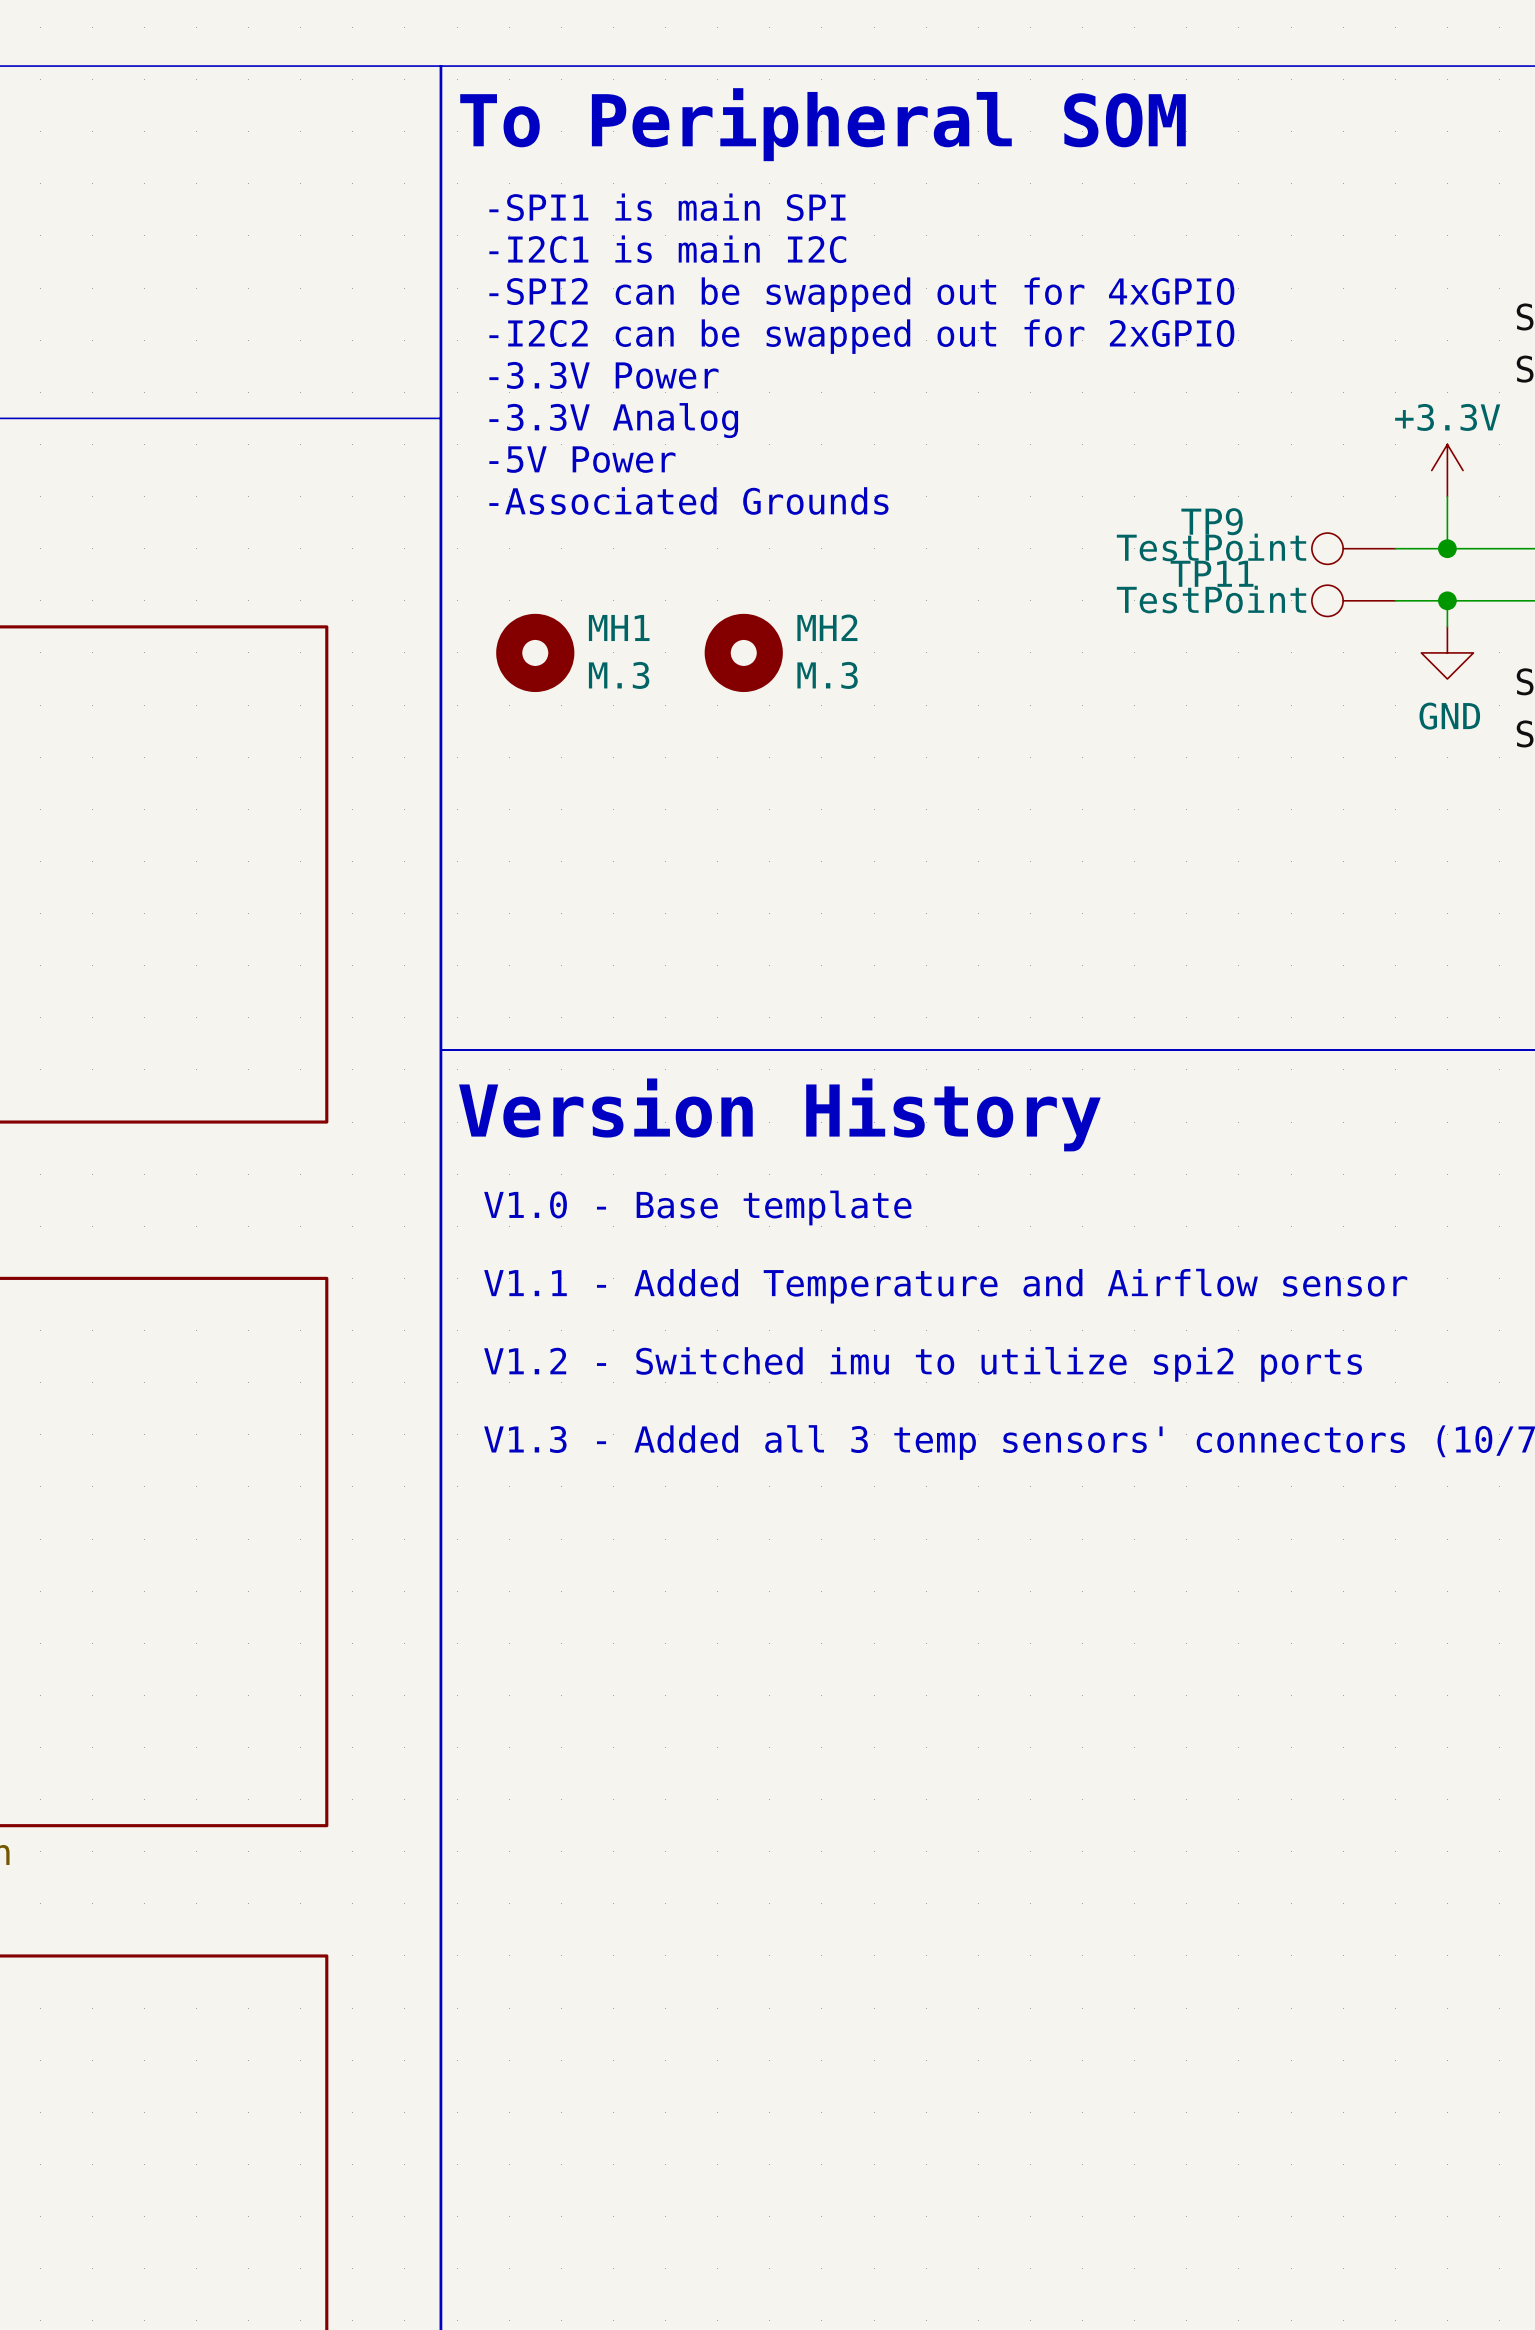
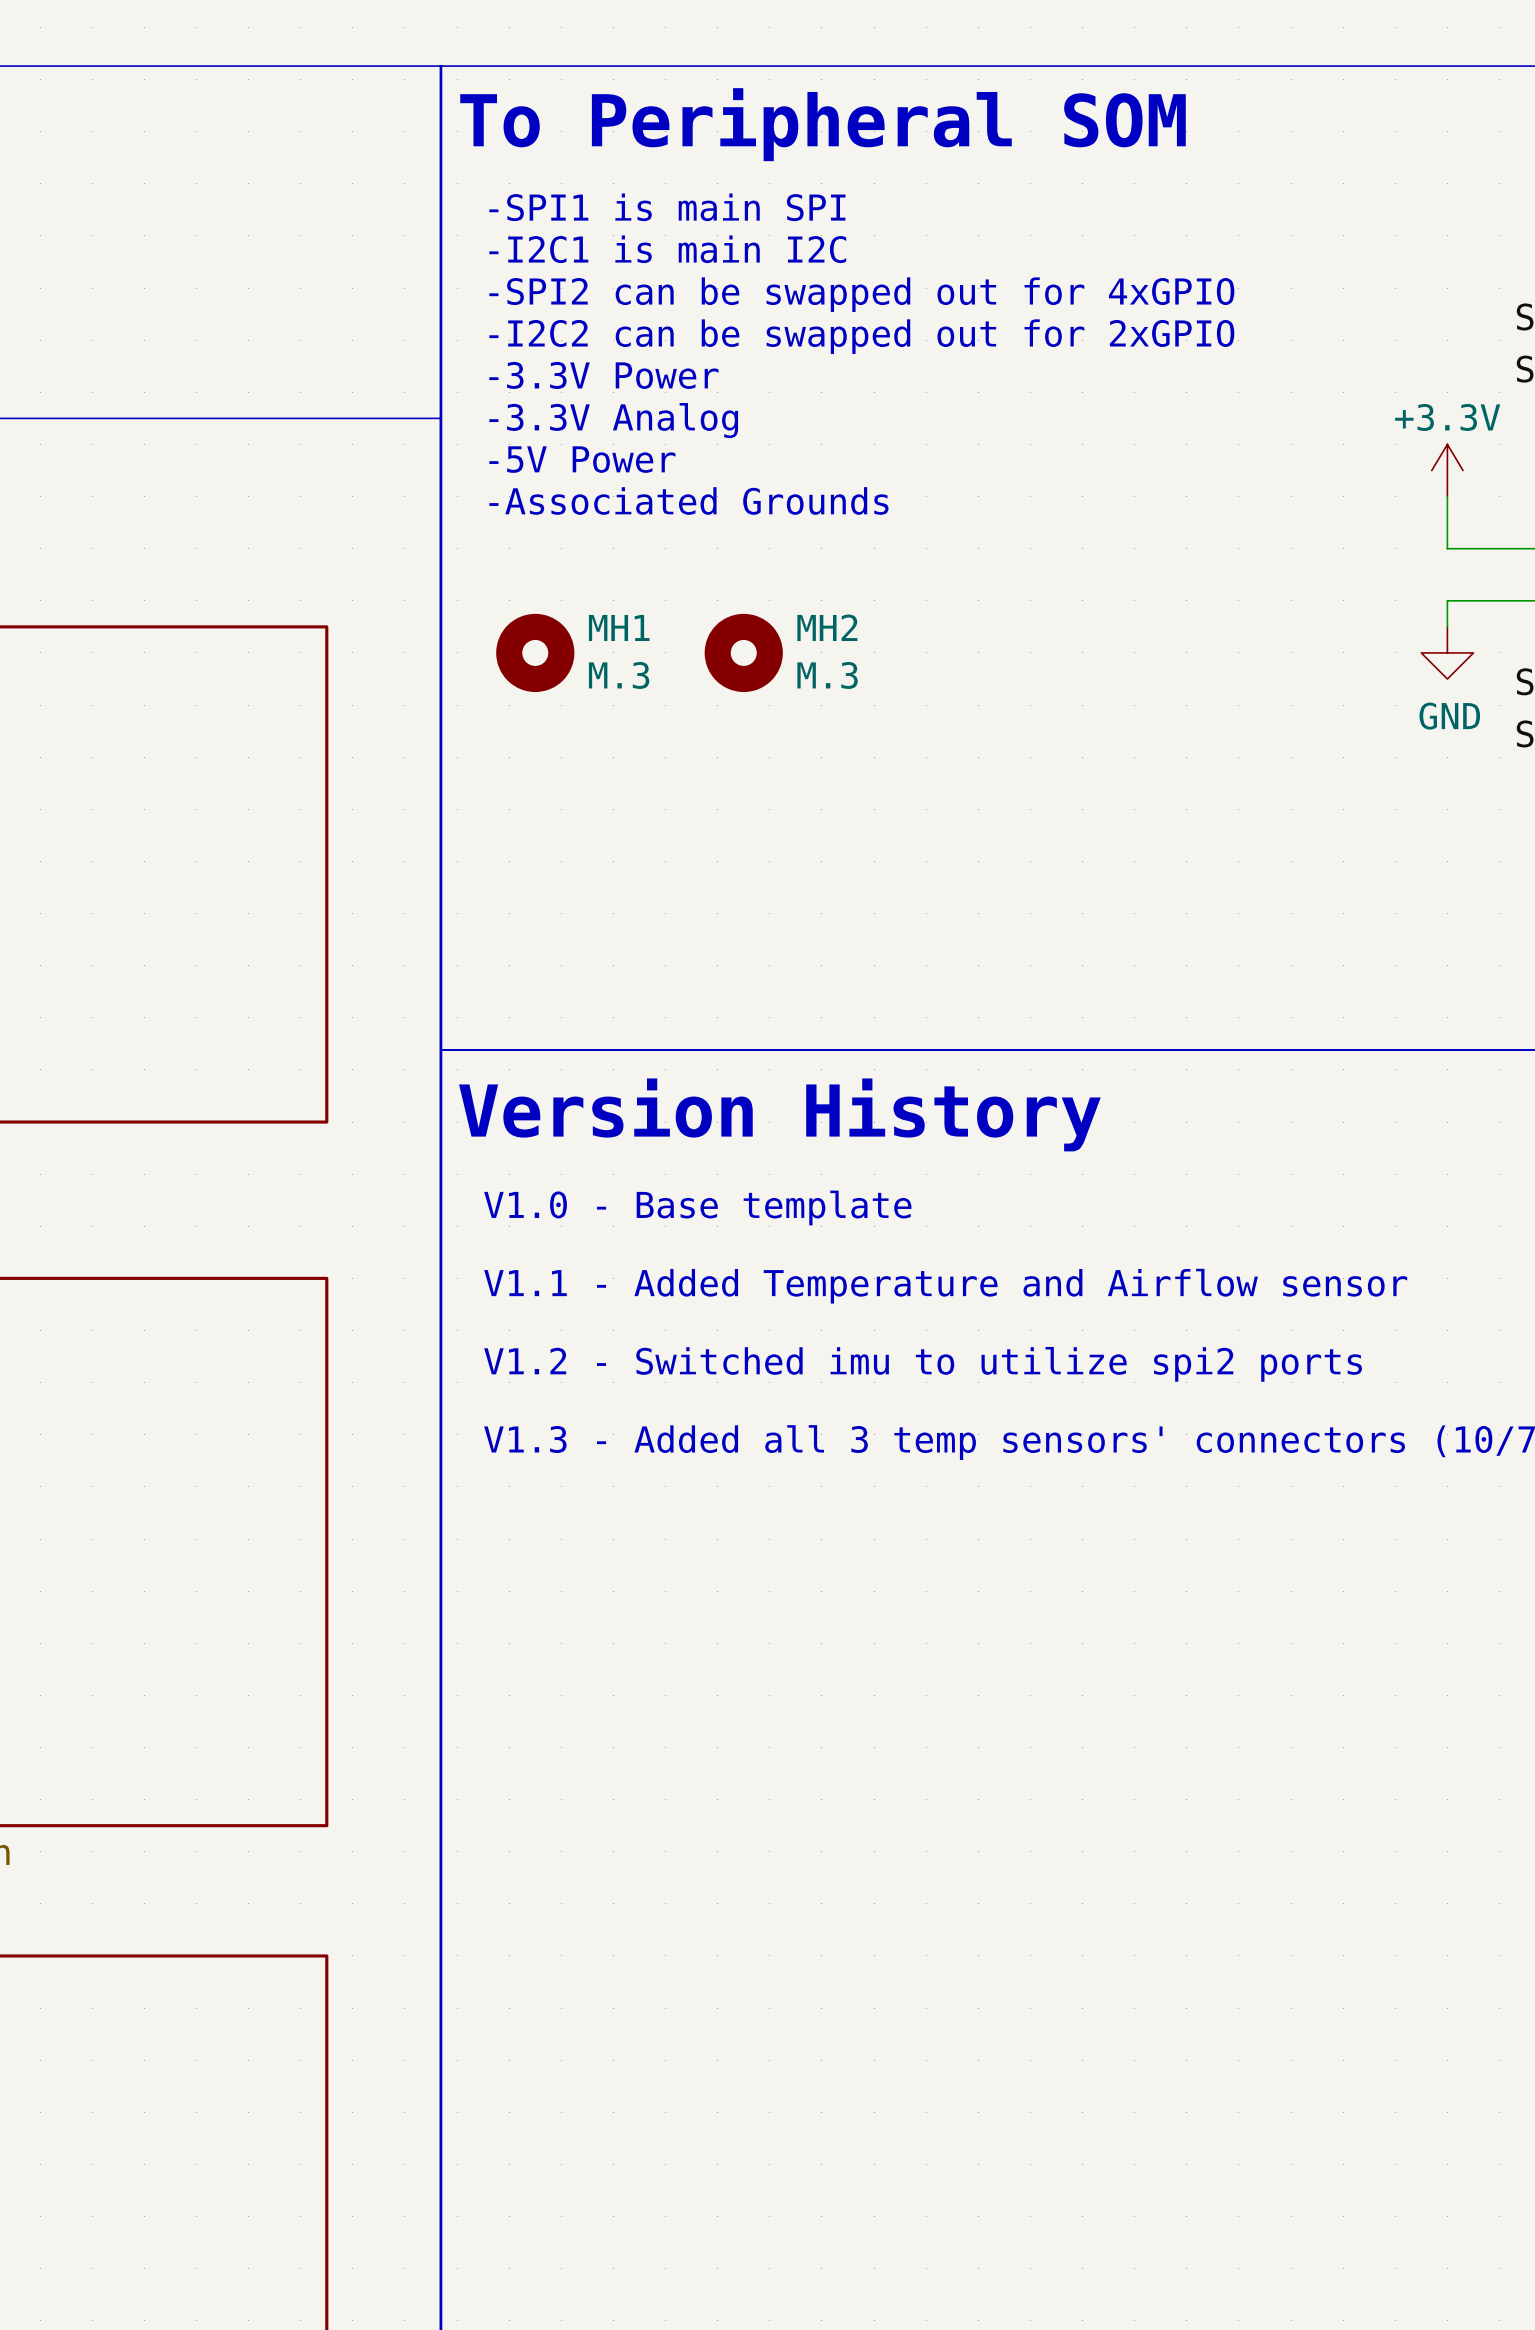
TP9: TestPoint (1353, 548) -> none
wire: (1395, 548) (1447, 548) -> none
junction: (1447, 548) -> none
TP11: TestPoint (1353, 600) -> none
wire: (1395, 600) (1447, 600) -> none
junction: (1447, 600) -> none

